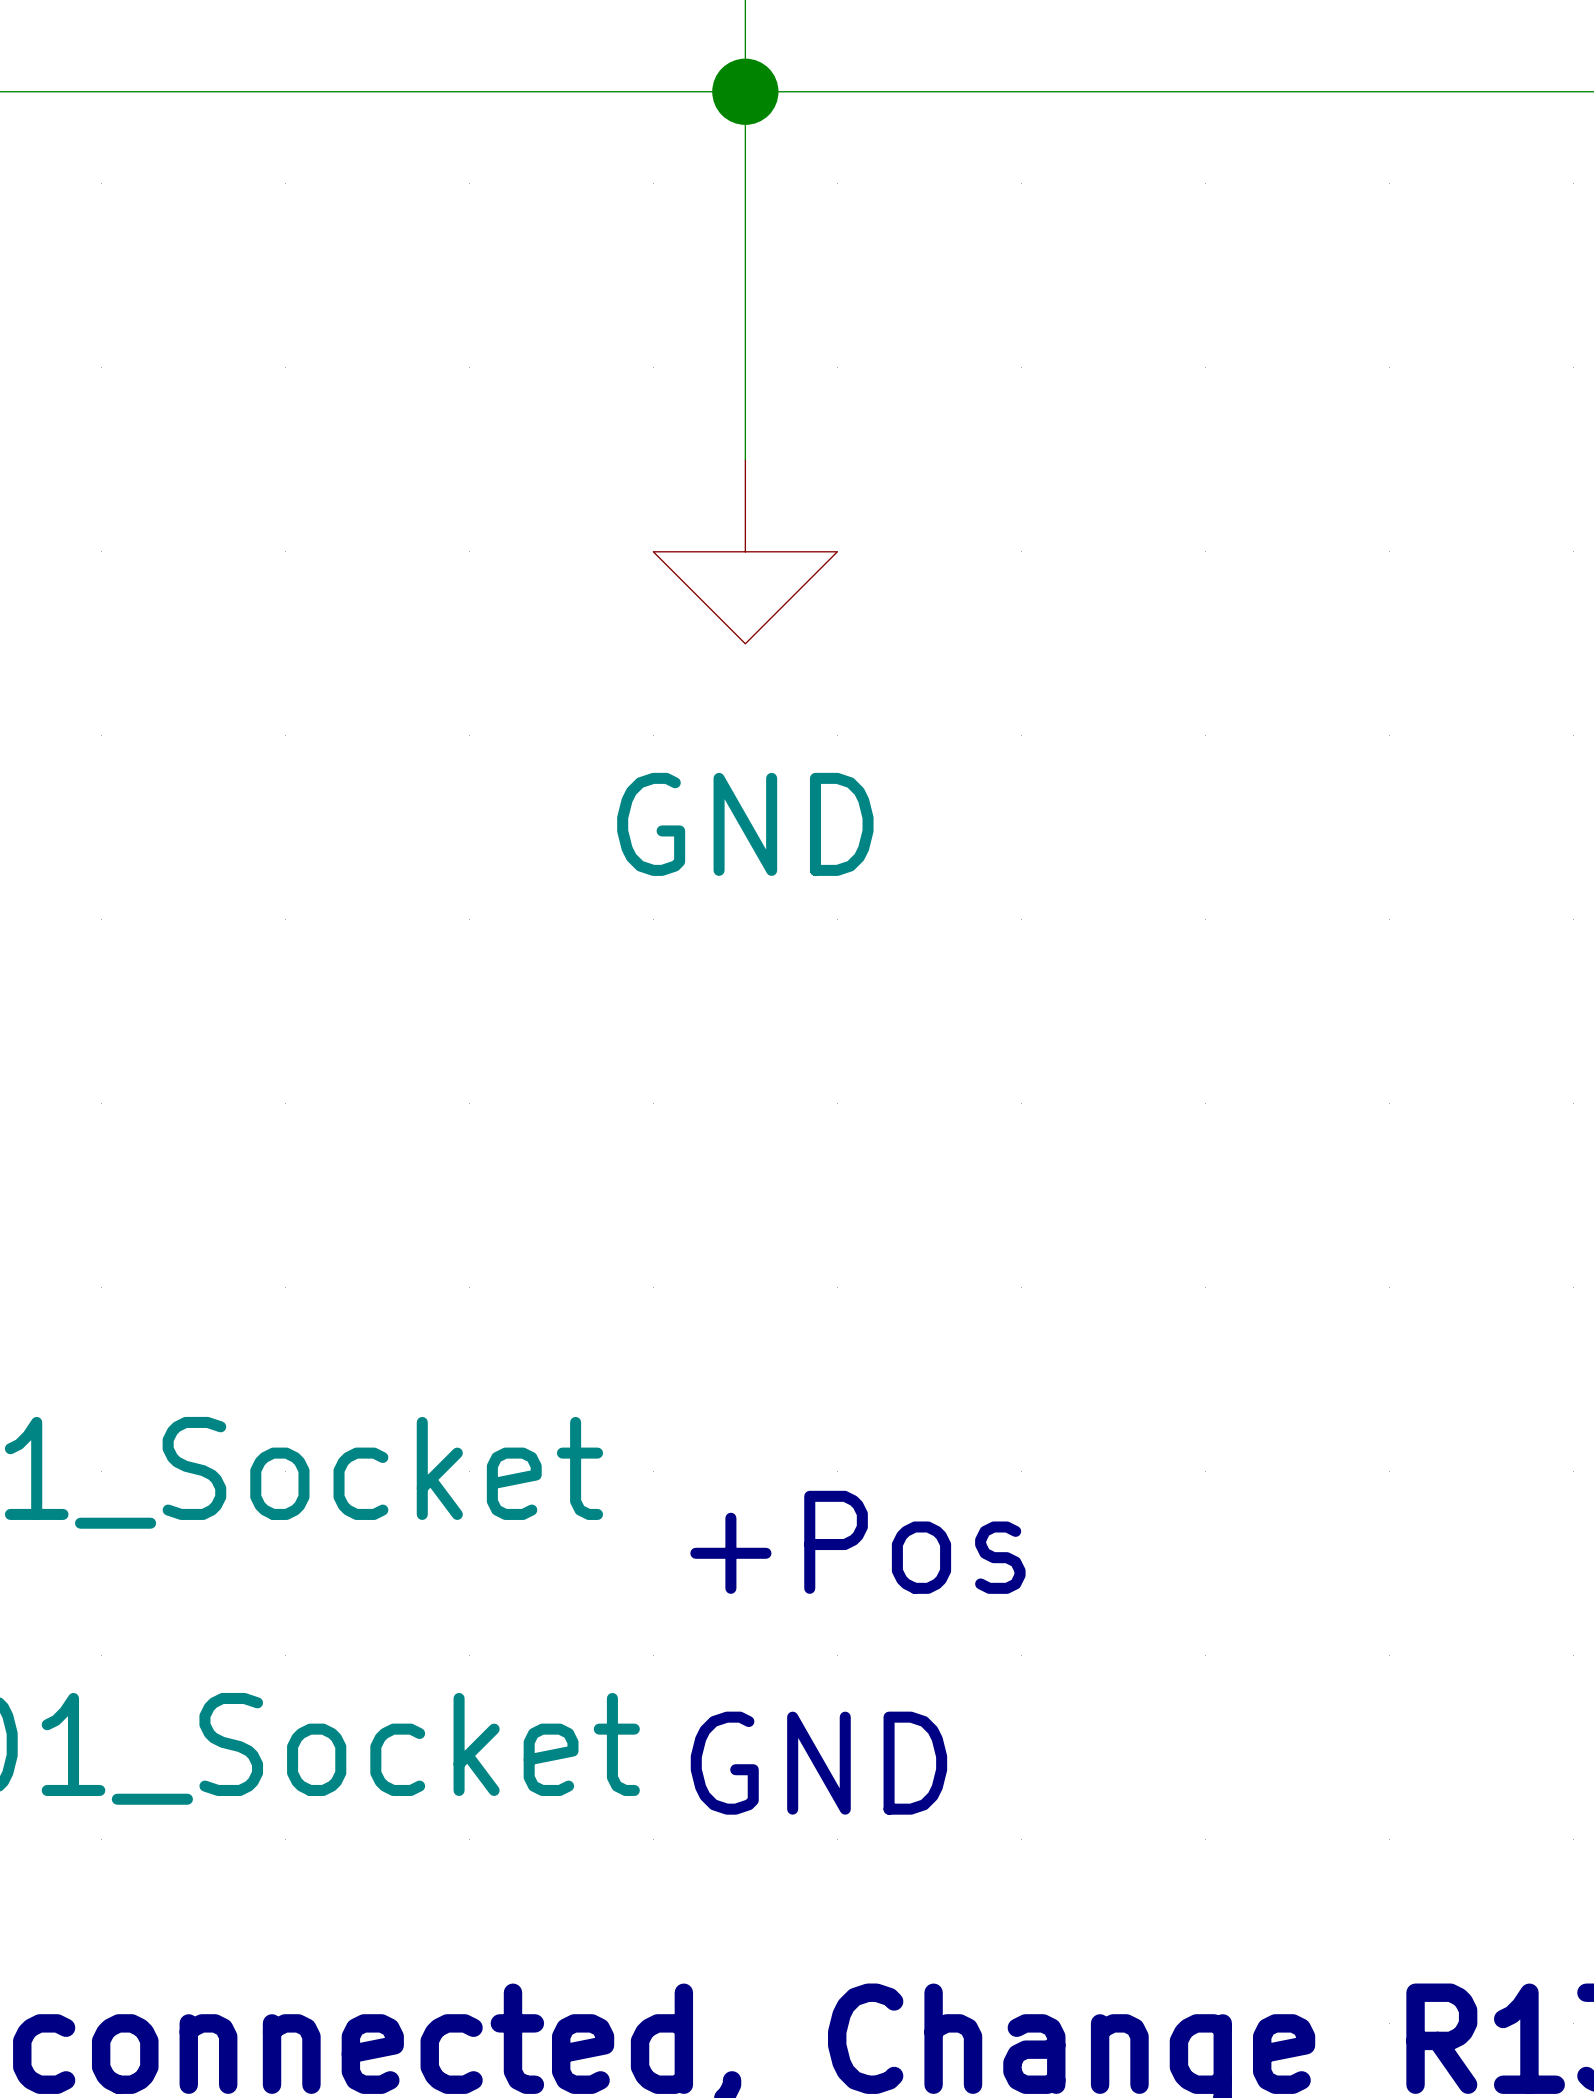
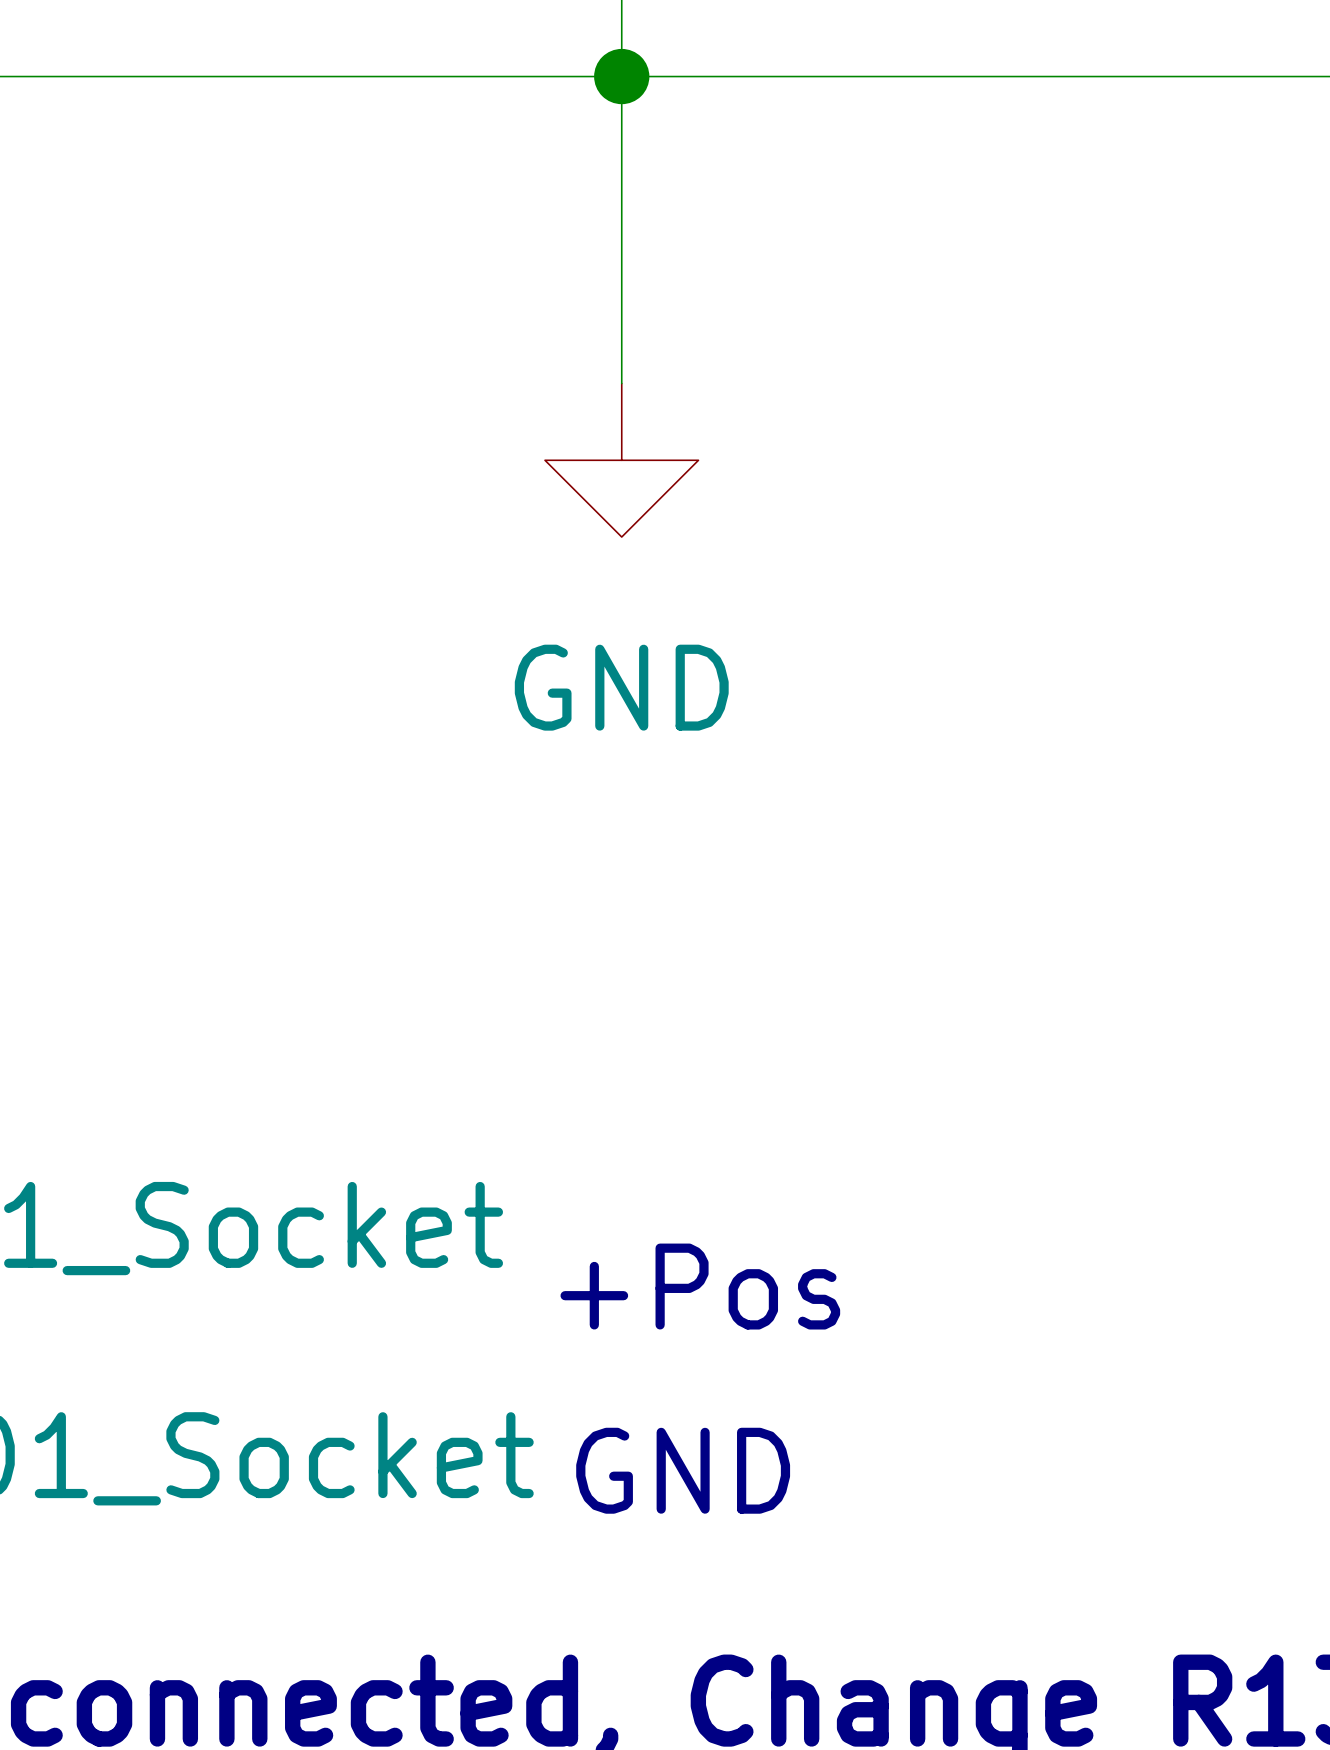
text position: +Pos (857, 1542) -> +Pos (700, 1286)

